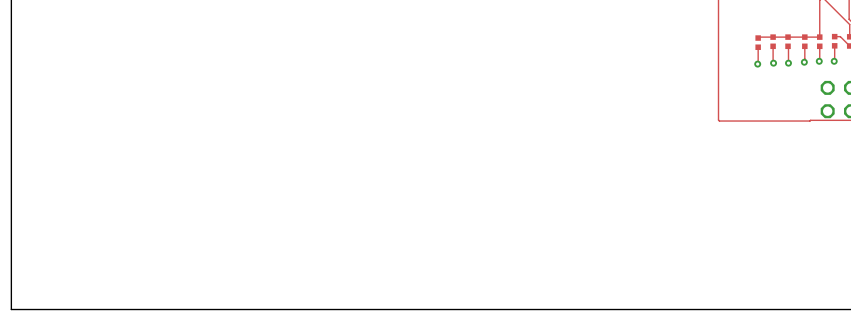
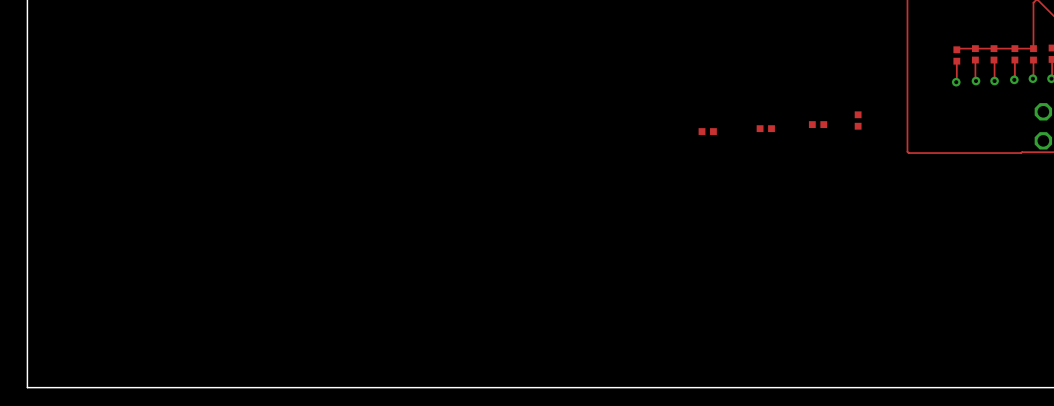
part: none -> (858, 120)
part: none -> (818, 124)
part: none -> (765, 128)
part: none -> (707, 131)

